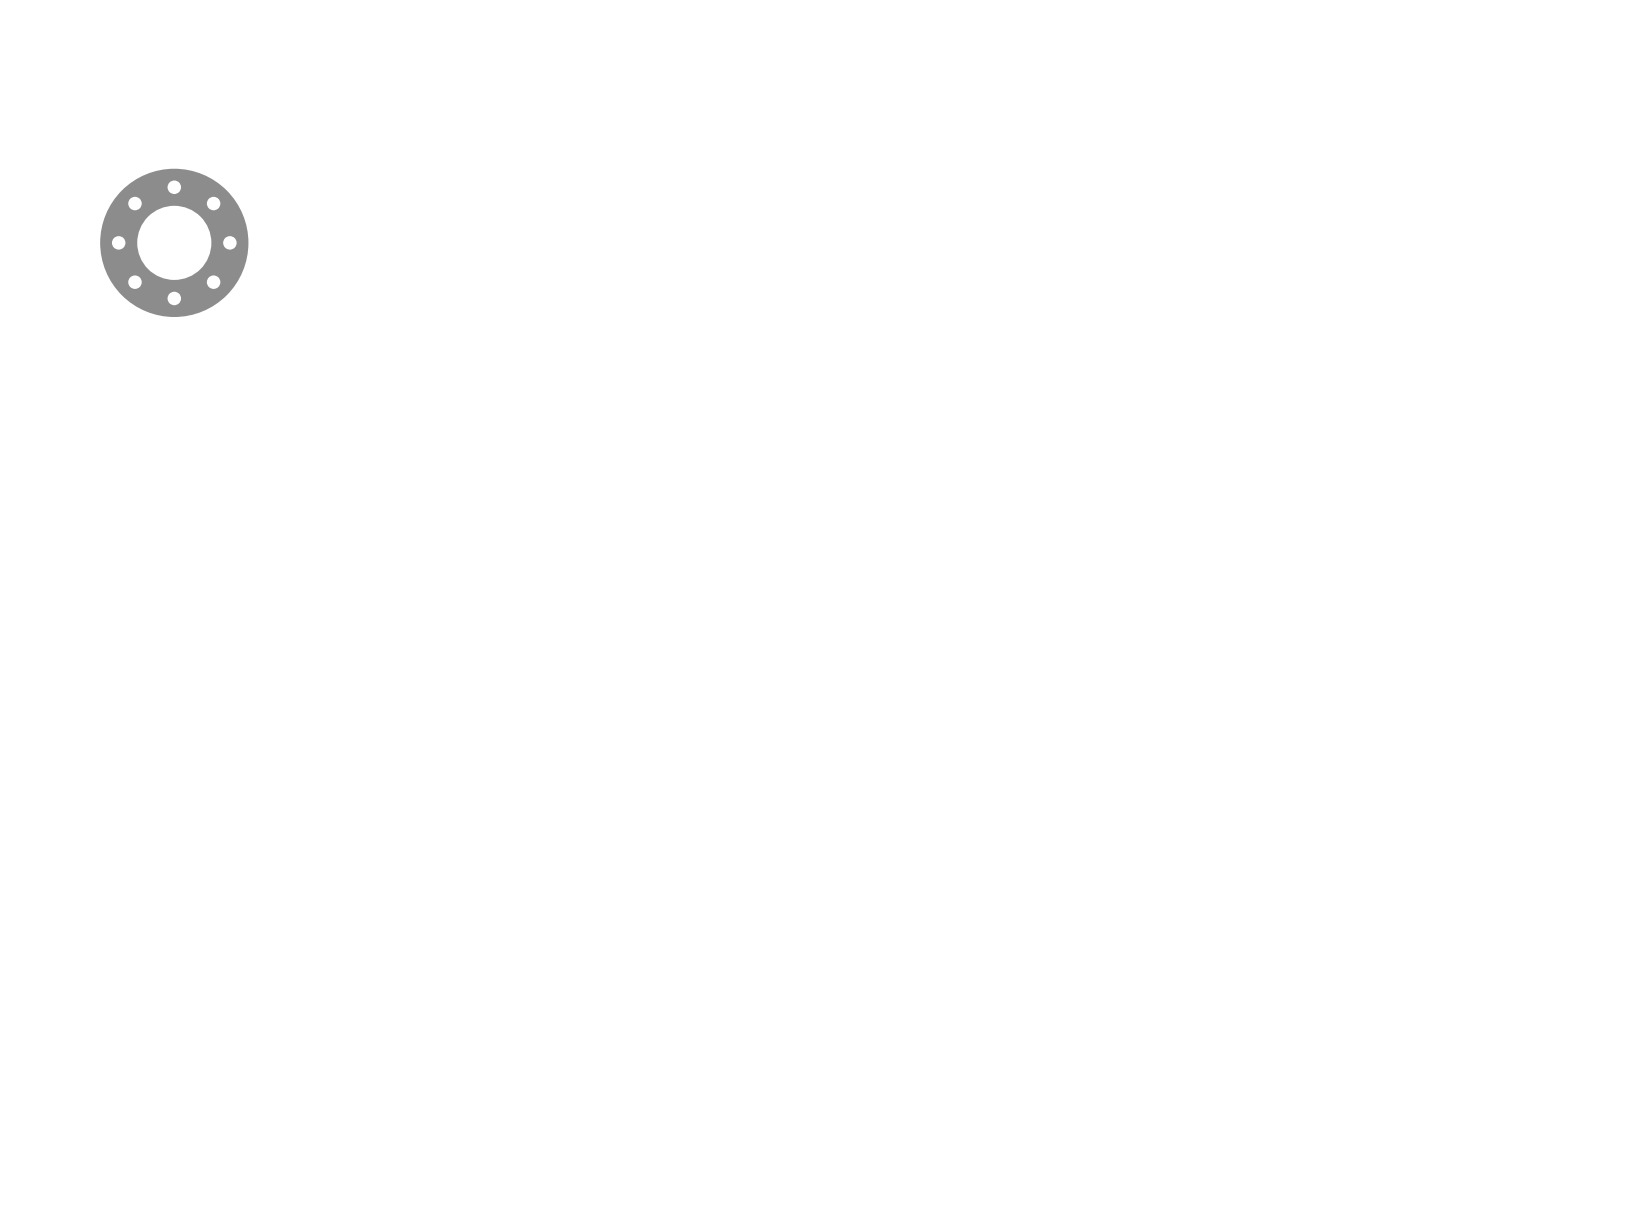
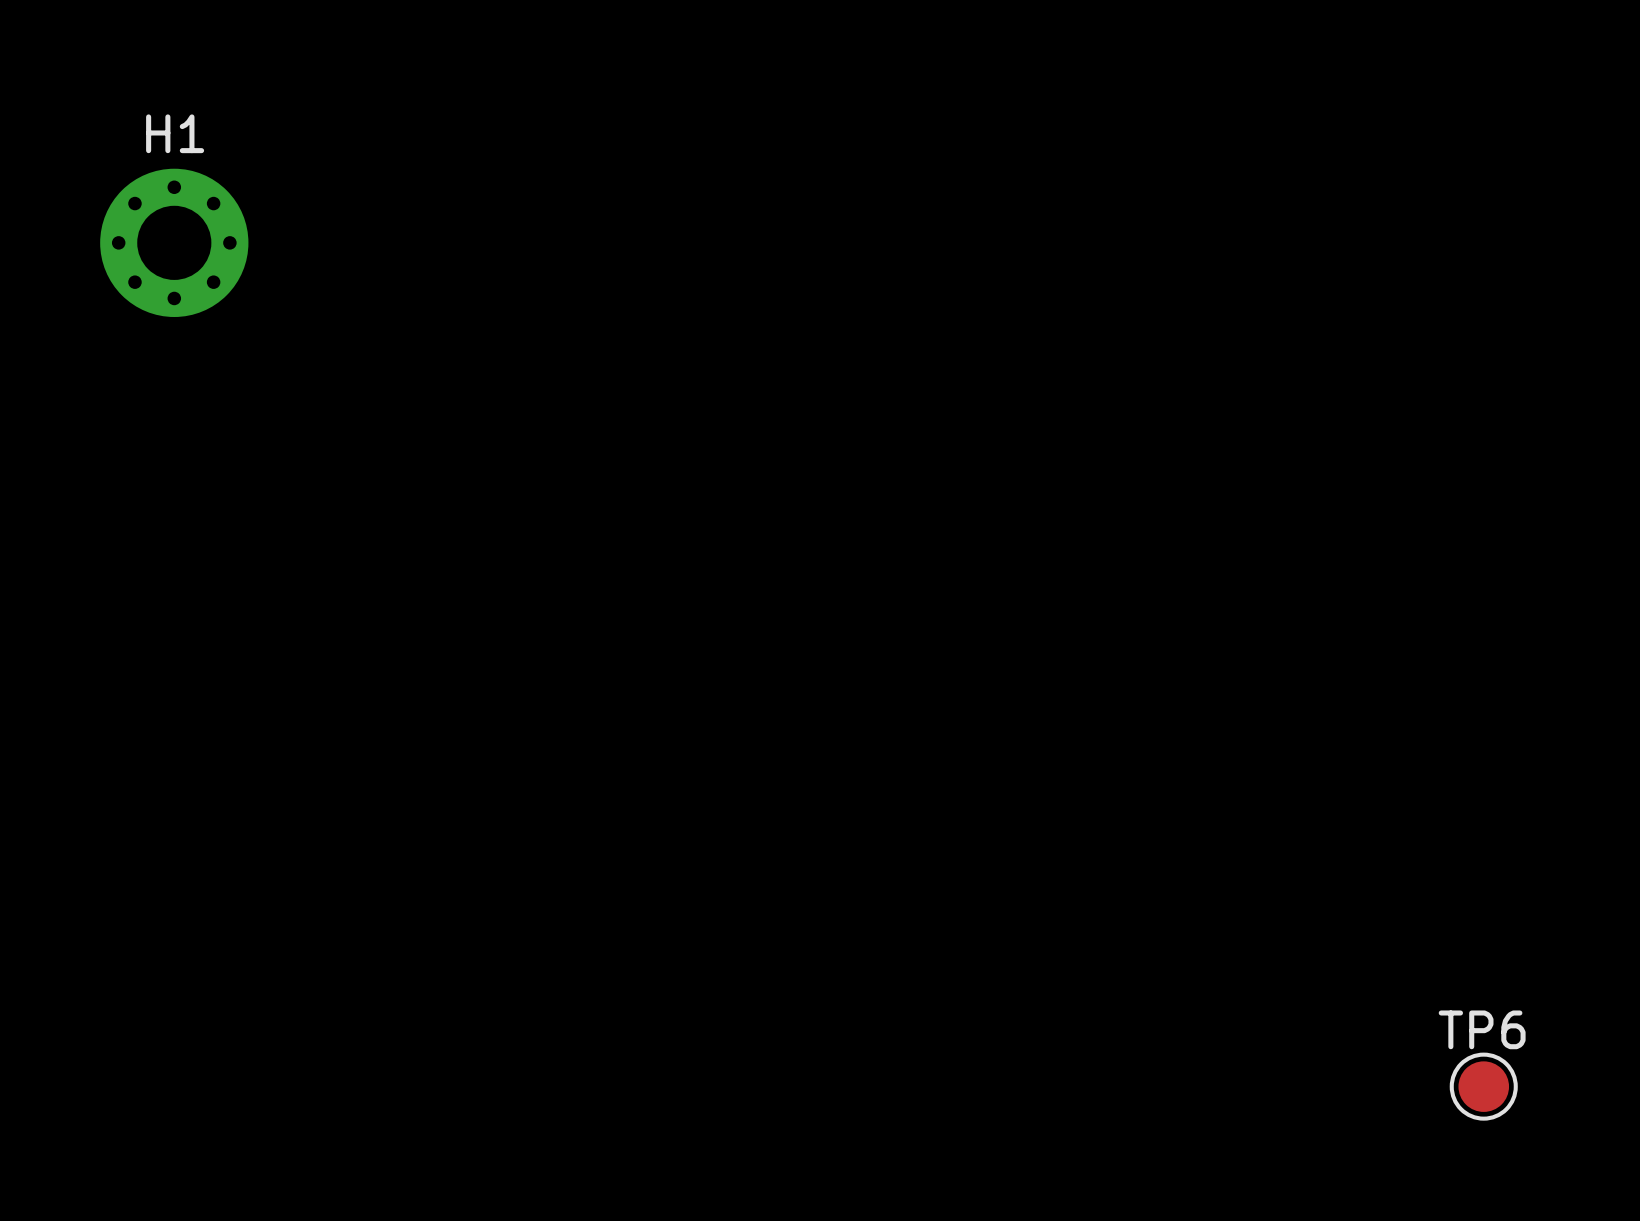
H1 name: none -> H1 (175, 133)
TP6: none -> (1483, 1086)

